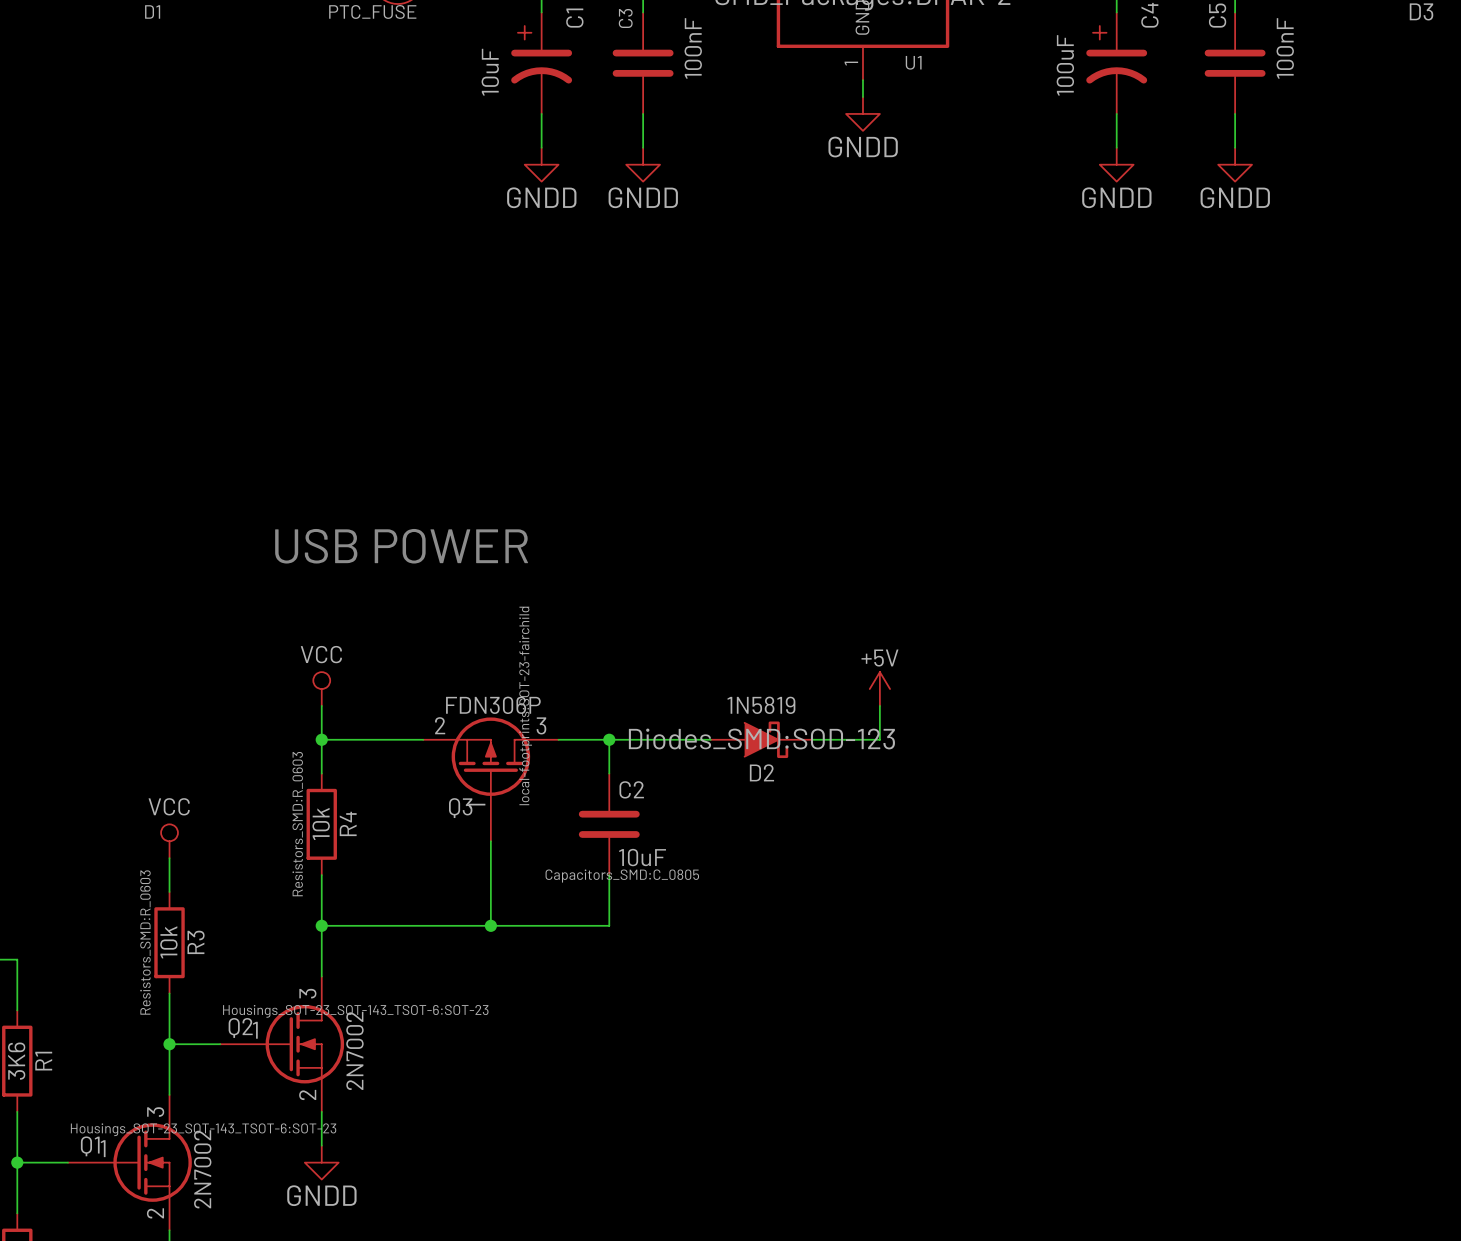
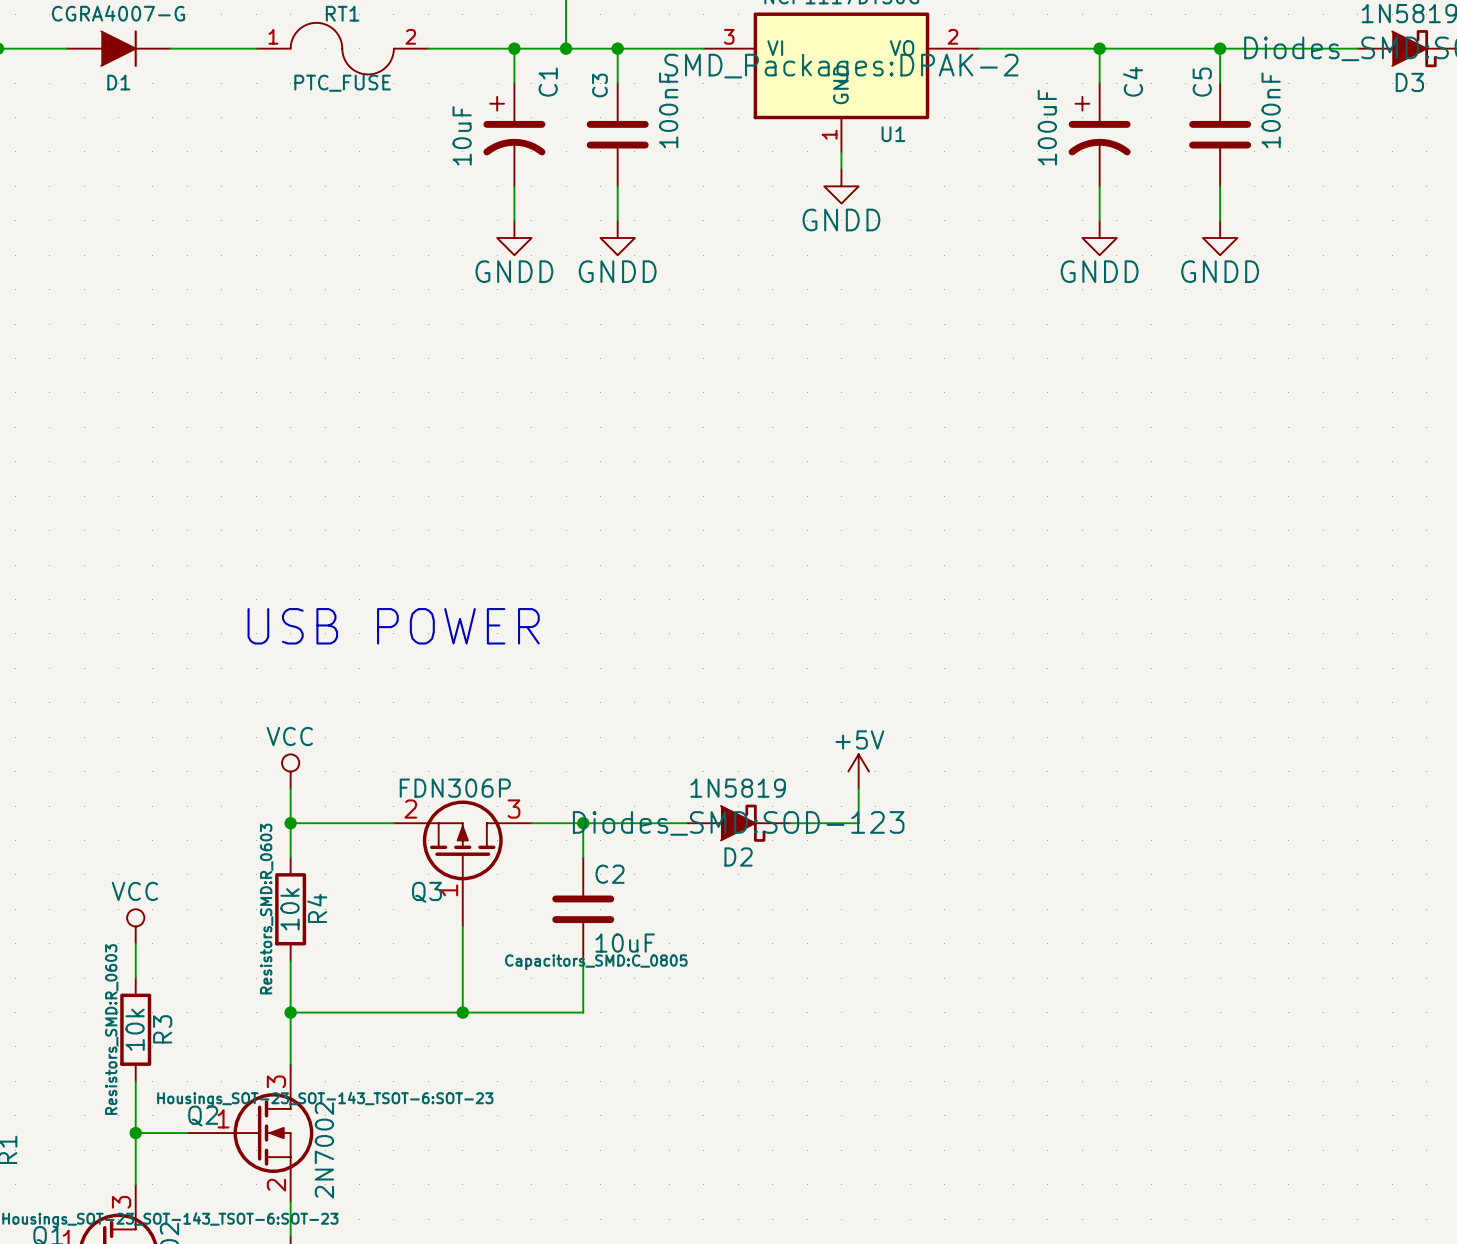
Q3 text: local-footprints:SOT-23-fairchild (525, 705) -> none

